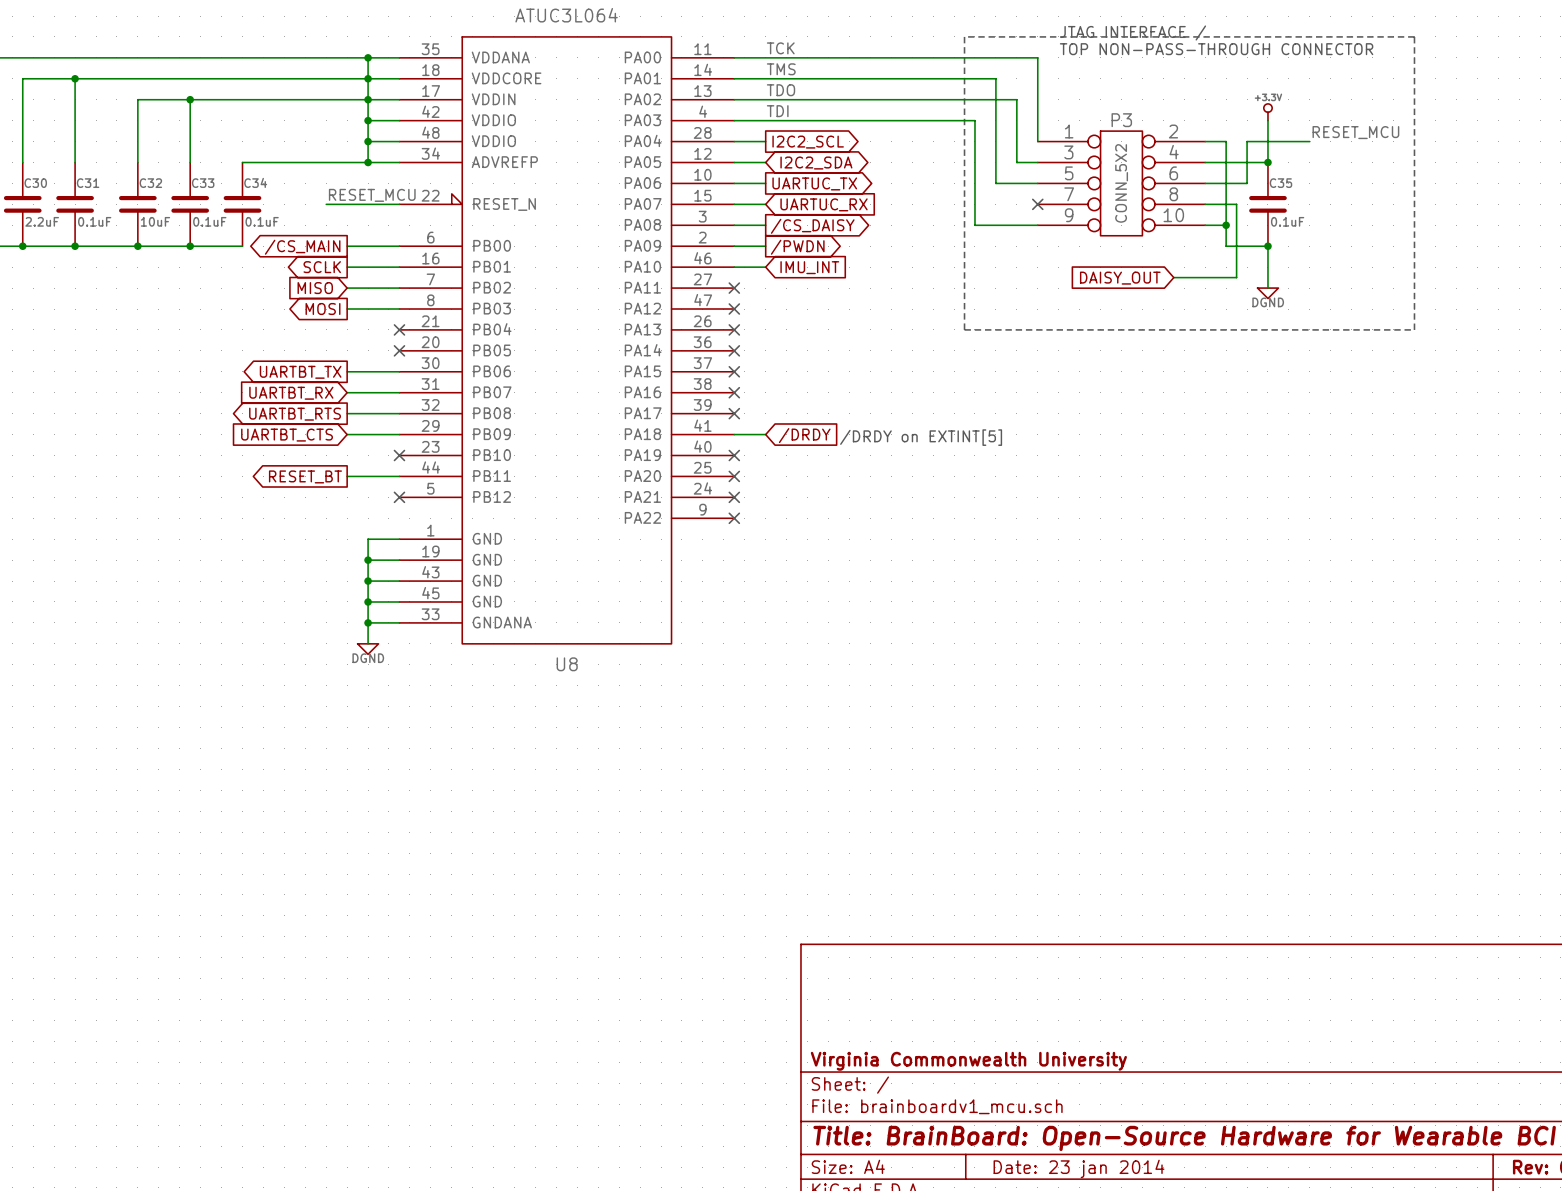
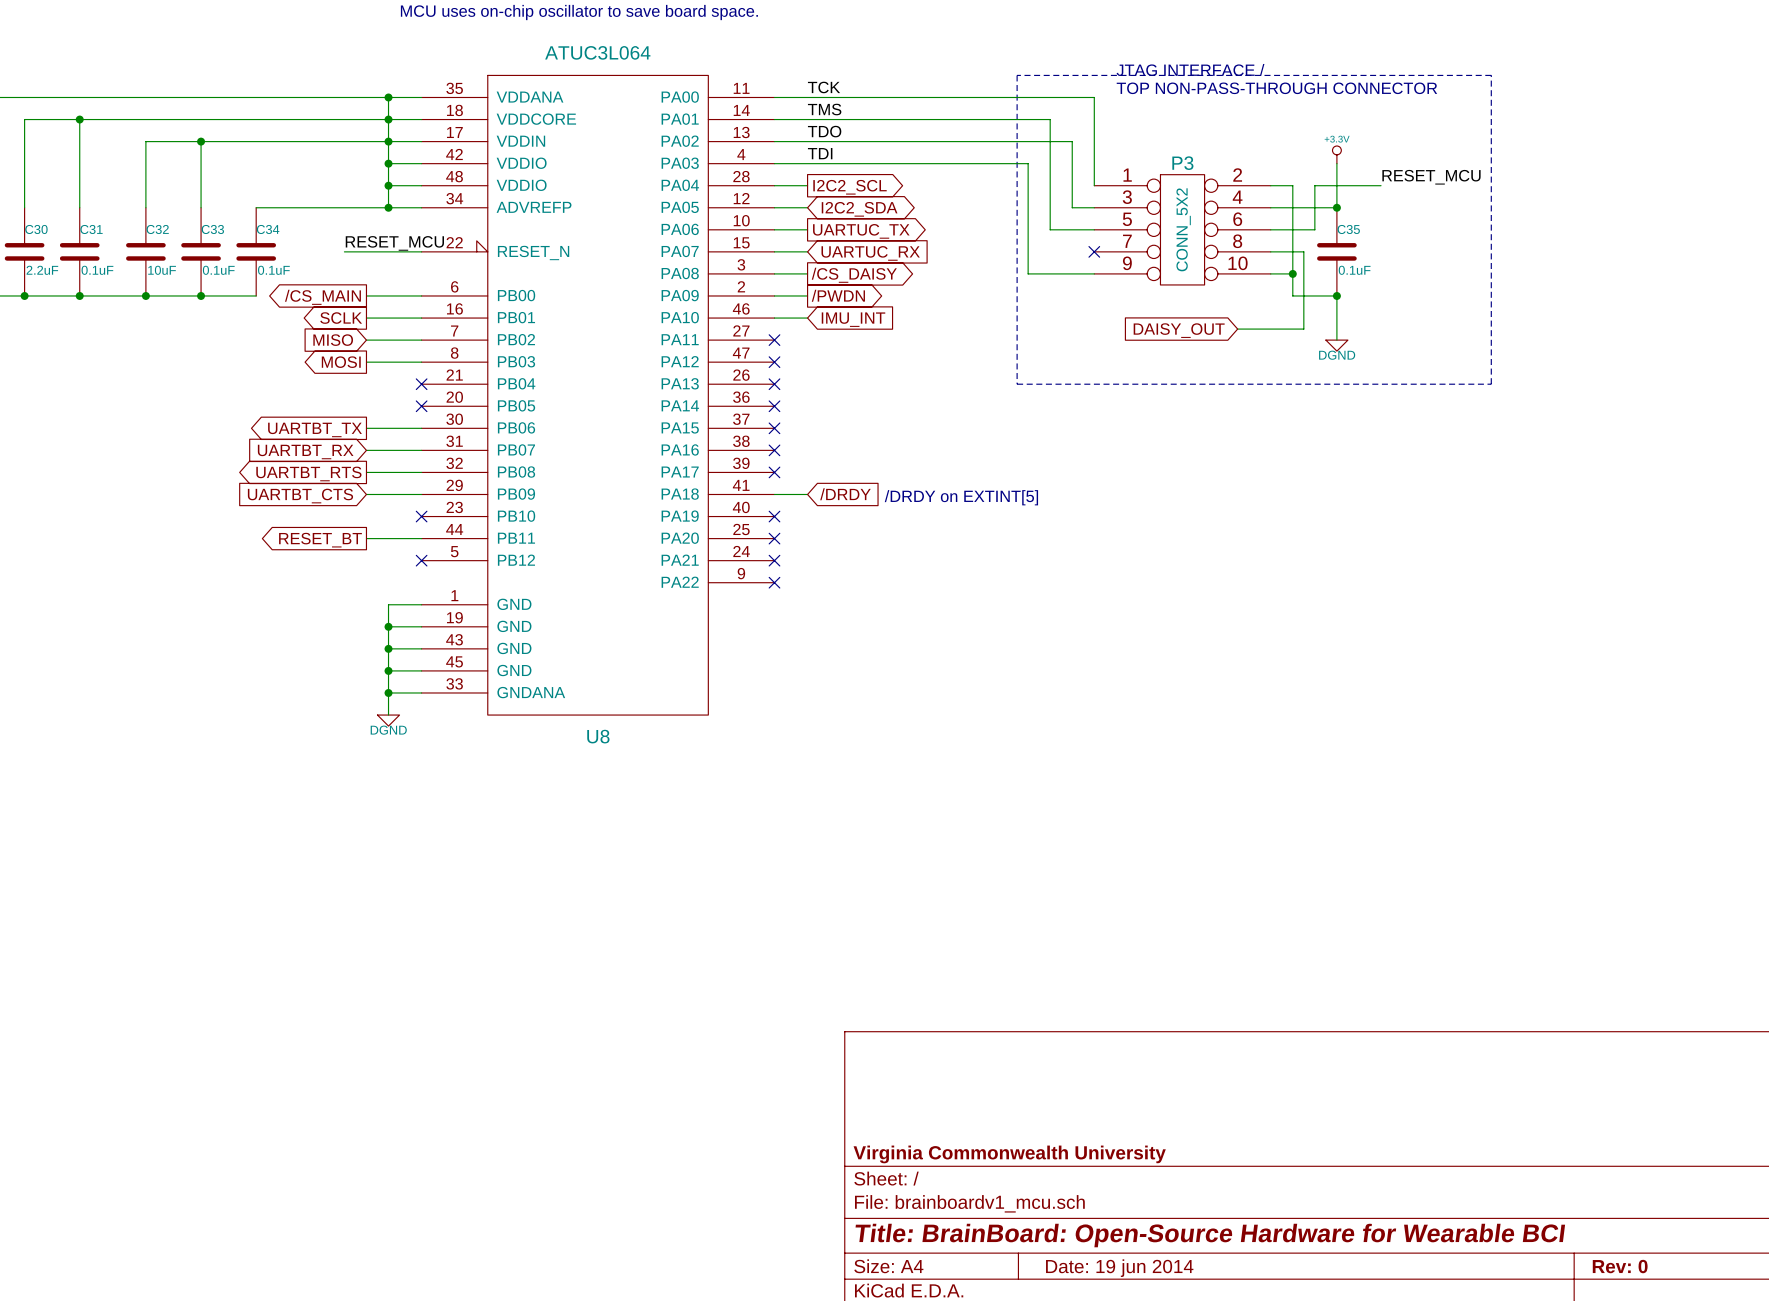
title block: Date: 23 jan 2014 (1079, 1168) -> Date: 19 jun 2014 (1119, 1268)

